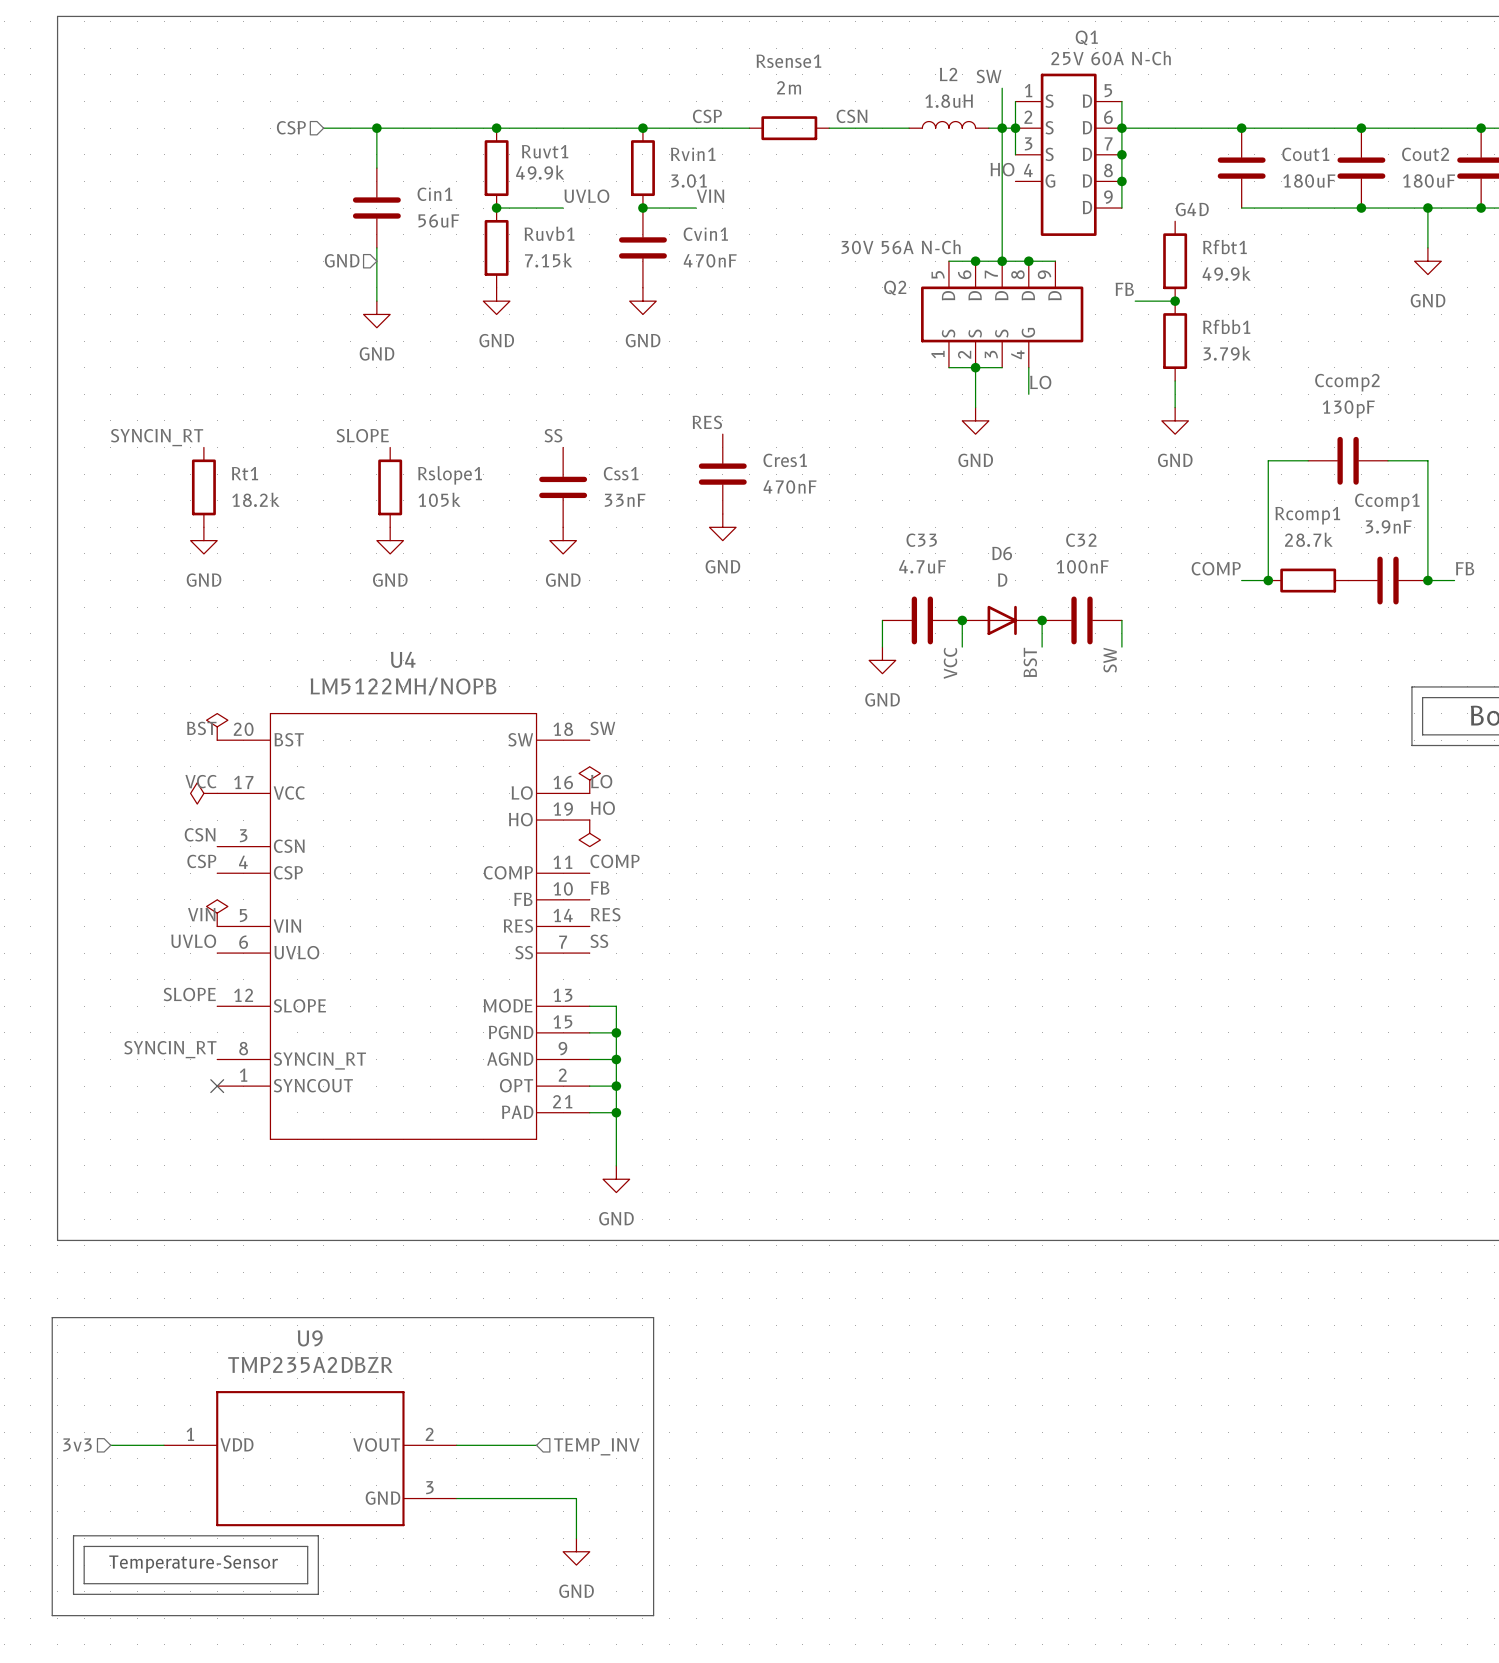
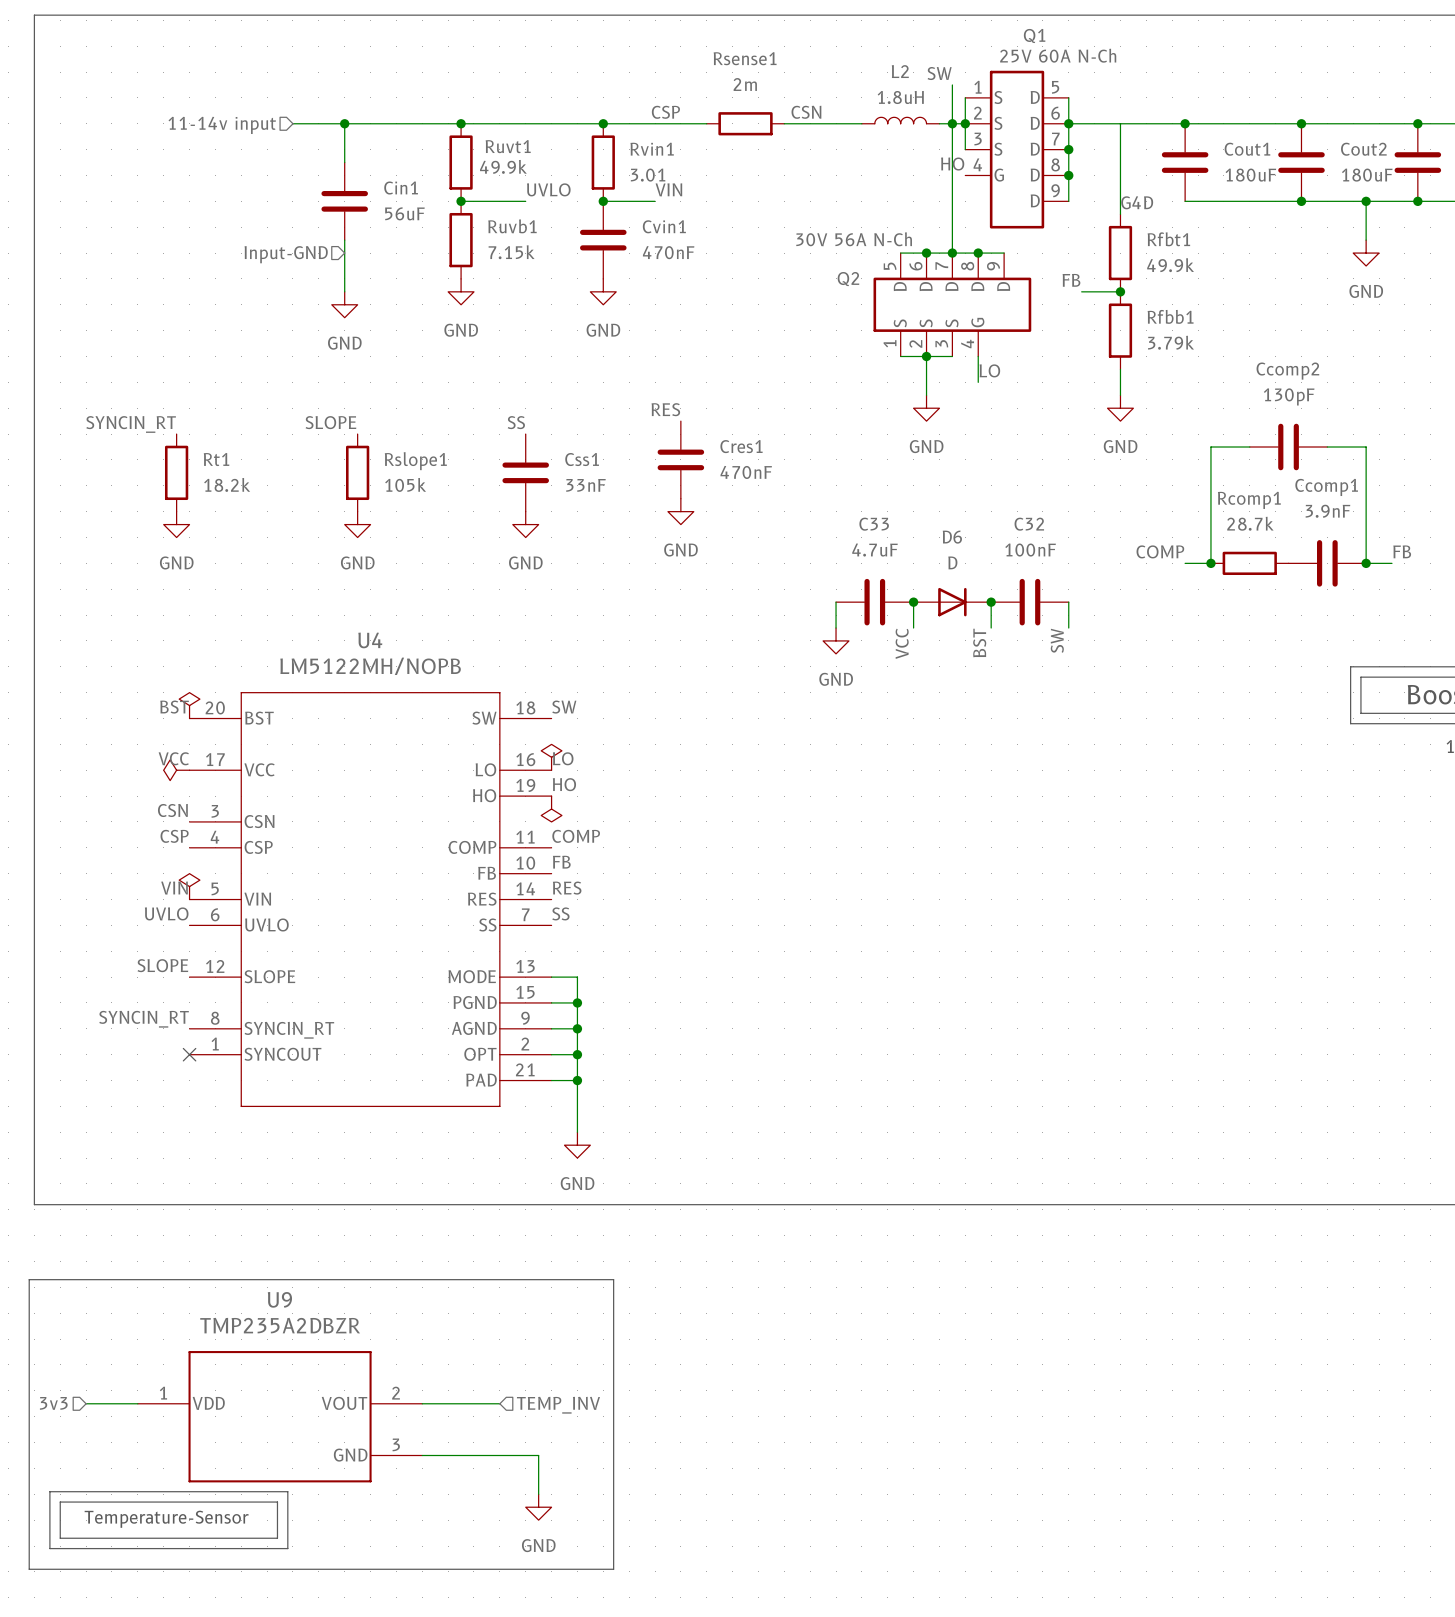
hierarchical label: CSP (291, 127) -> 11-14v input (222, 125)
wire: none -> (1120, 123) (1120, 214)
hierarchical label: GND (342, 260) -> Input-GND (286, 254)

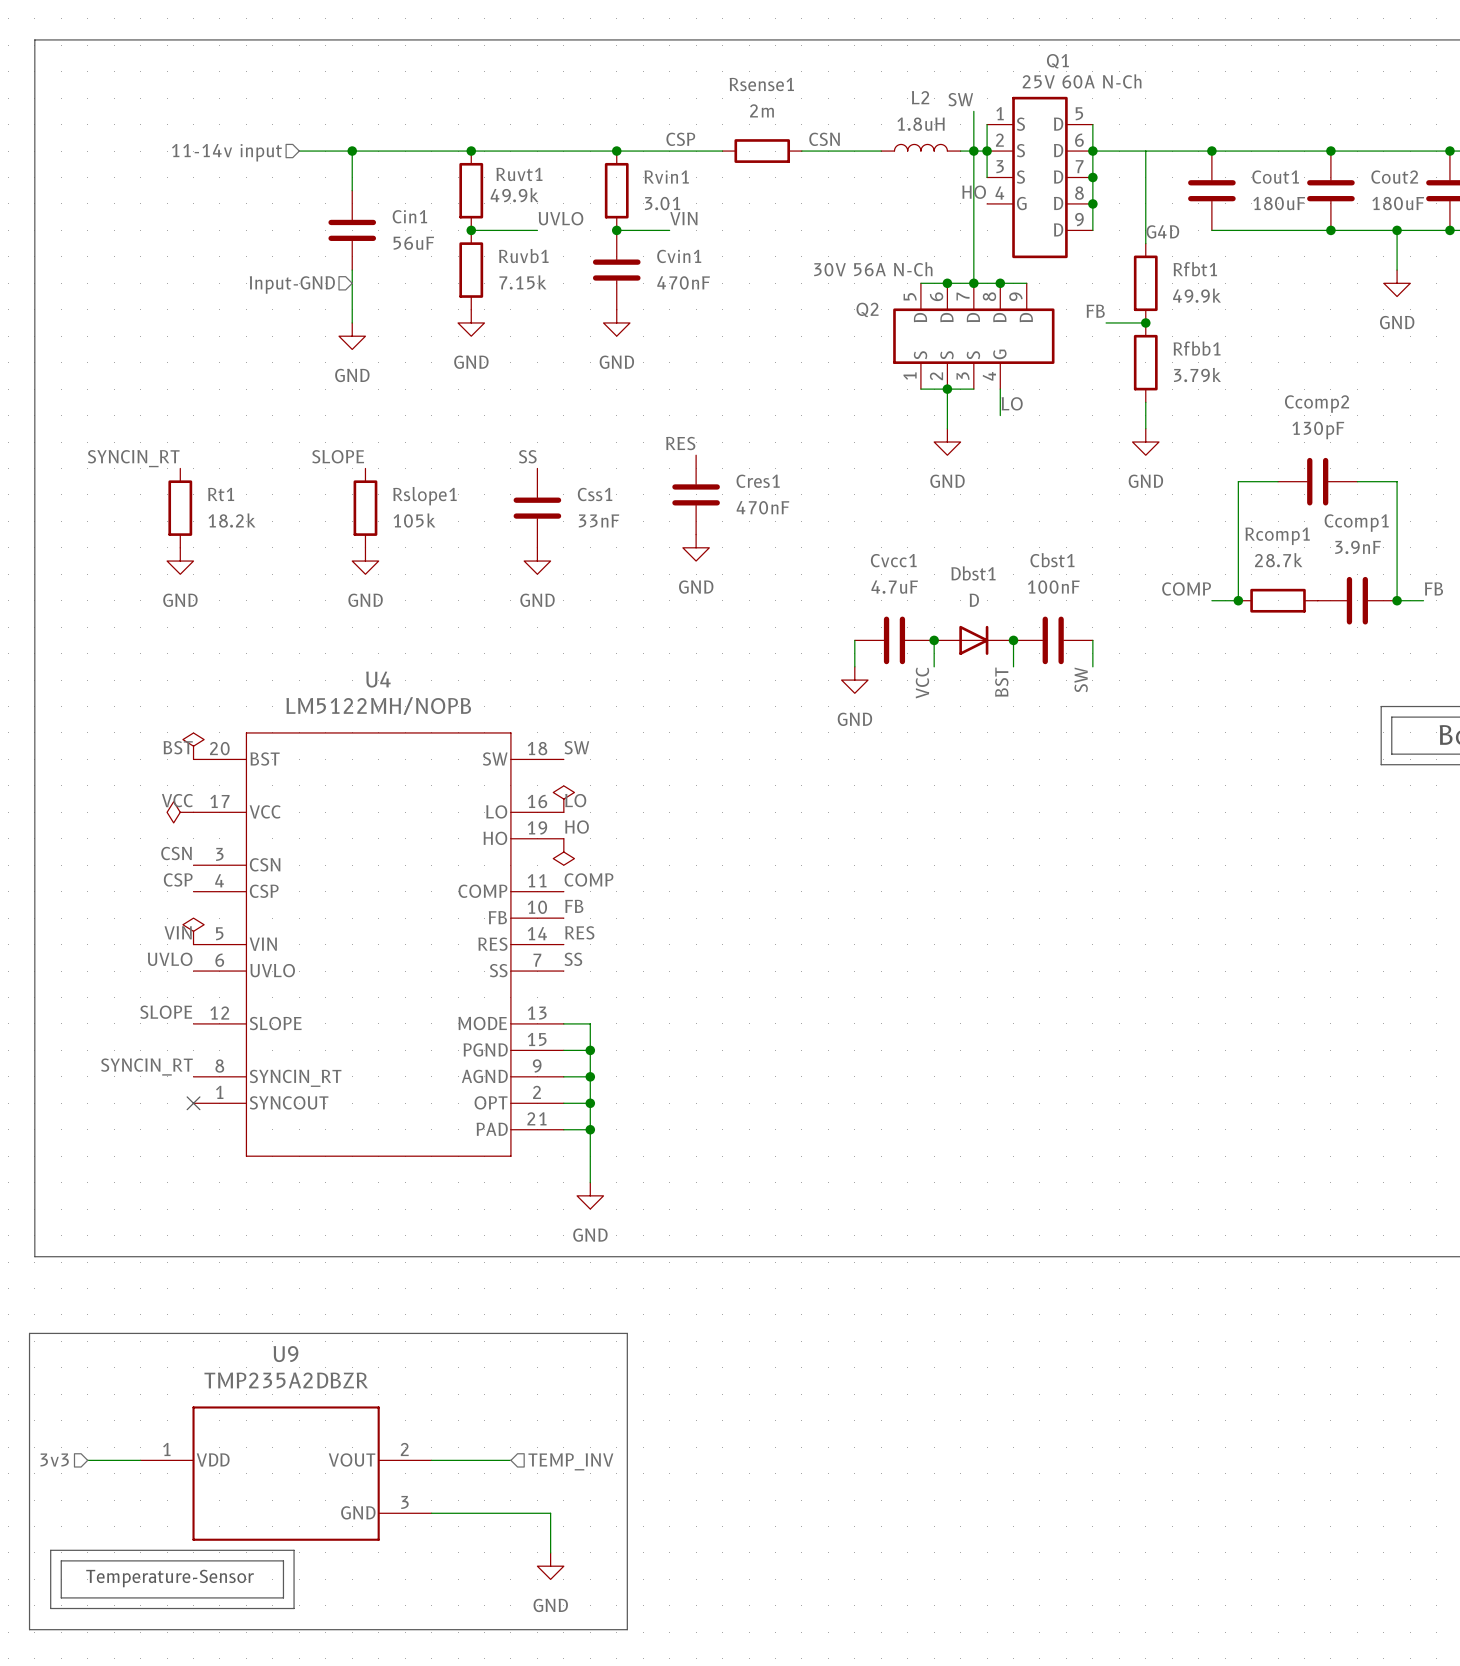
C33 name: C33 (874, 524) -> Cvcc1 (893, 560)
C32 name: C32 (1029, 524) -> Cbst1 (1052, 560)
D6 name: D6 (952, 537) -> Dbst1 (973, 573)

